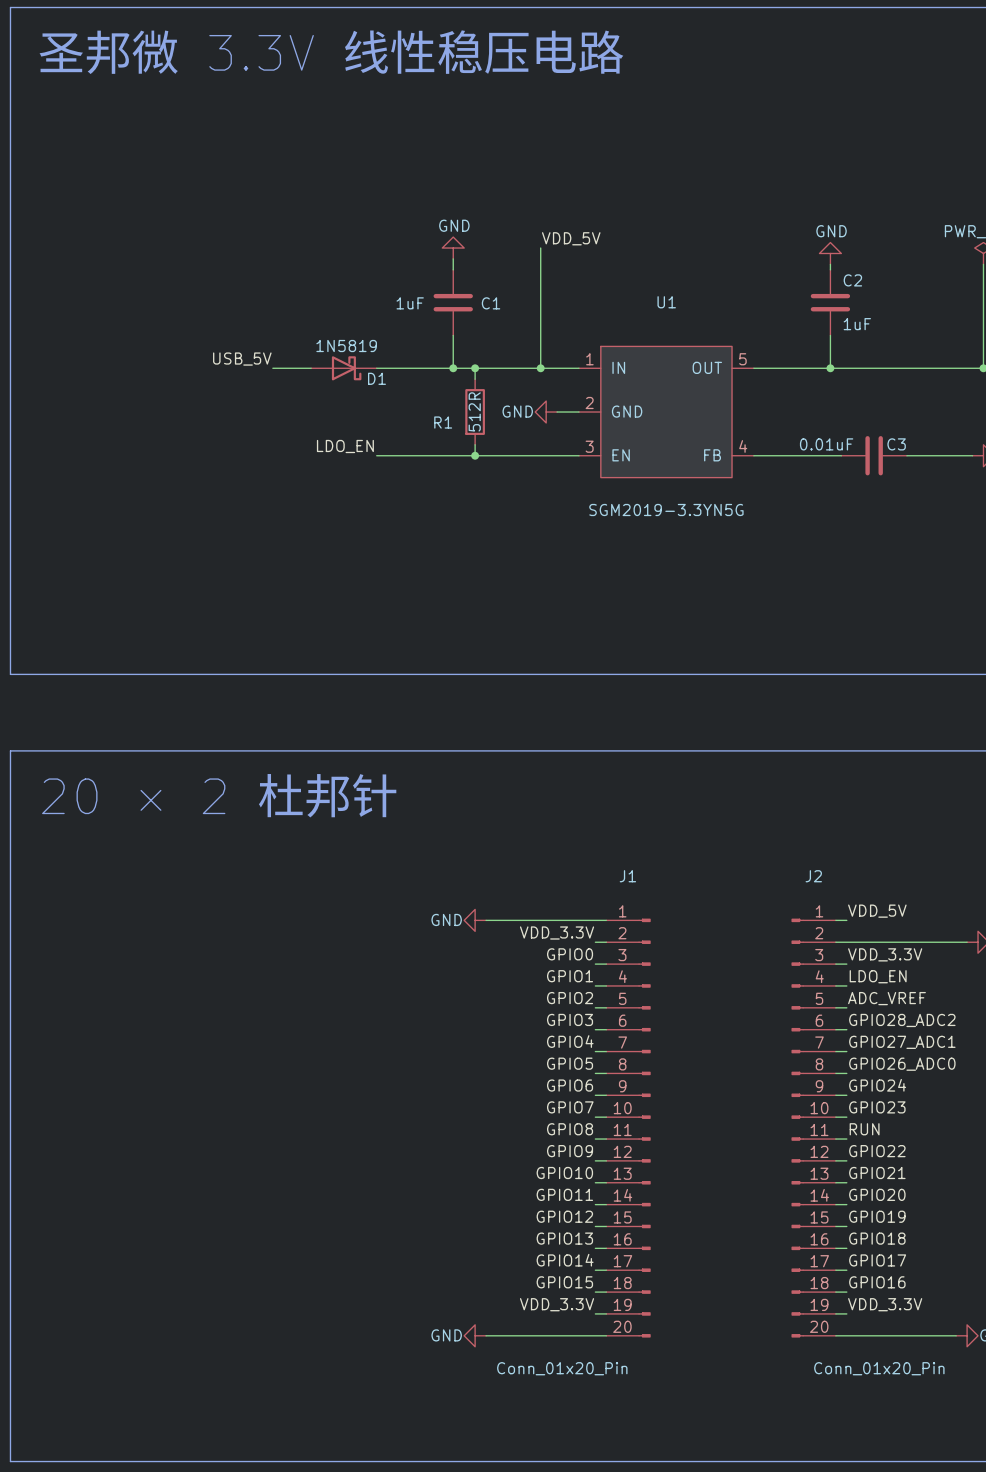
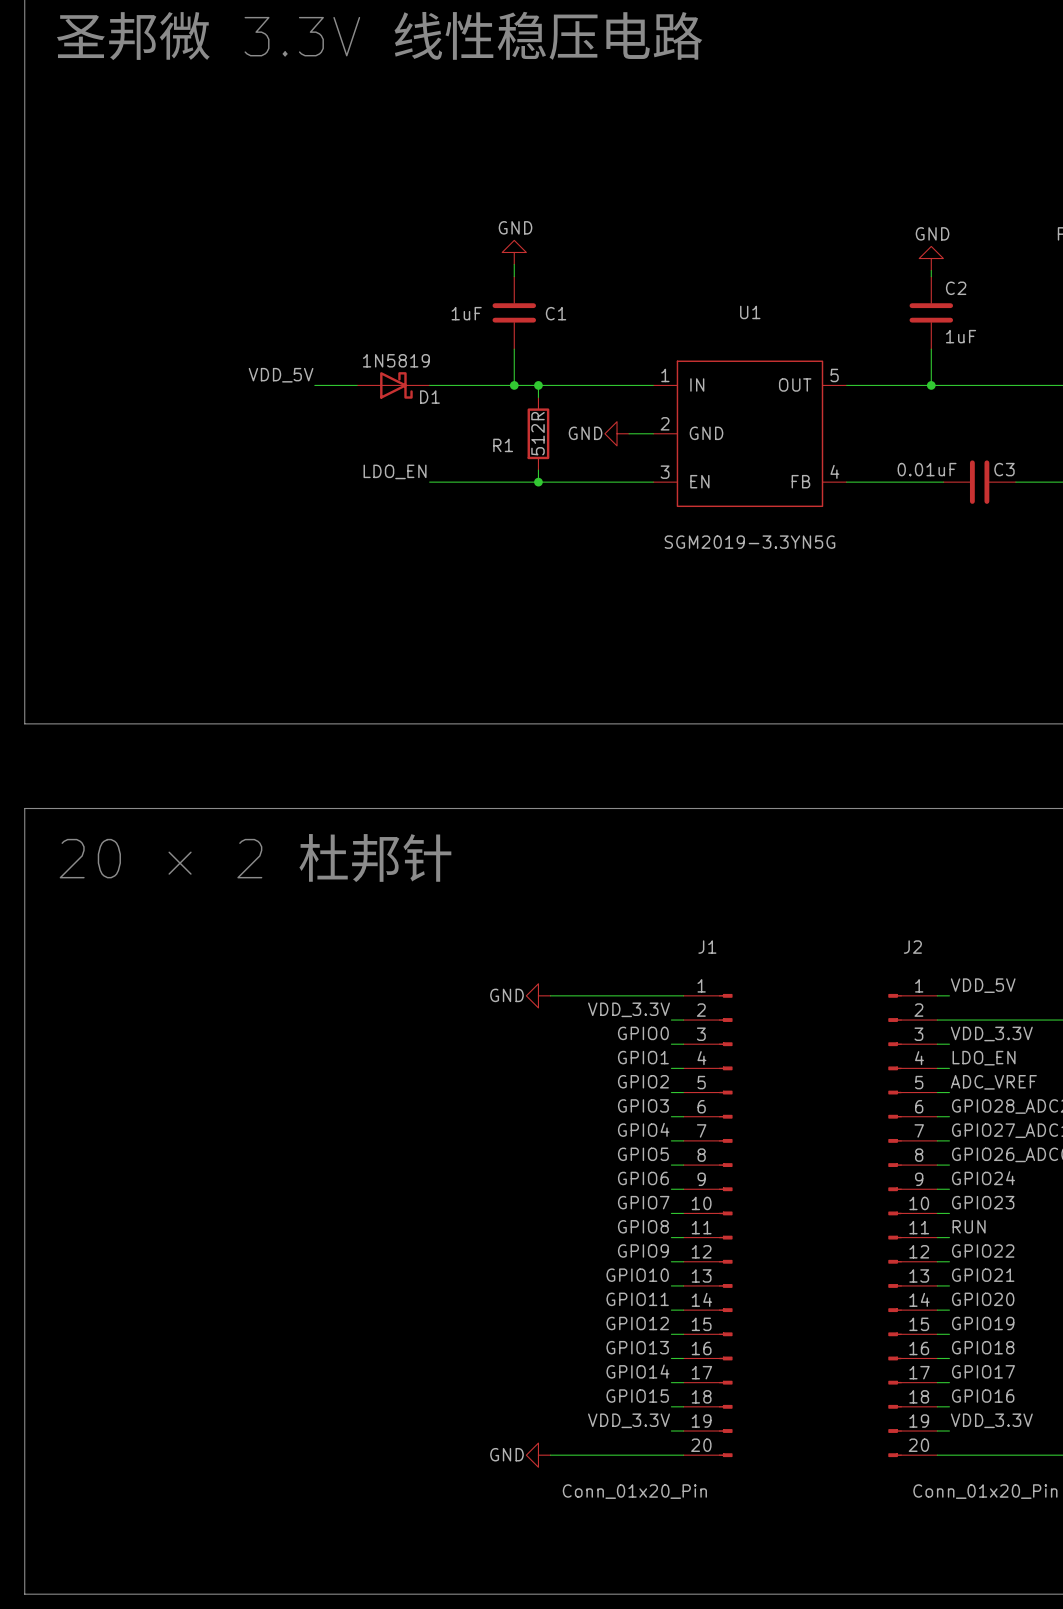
label: VDD_5V (571, 238) -> none
wire: (540, 248) (540, 368) -> none
label: USB_5V (242, 359) -> VDD_5V (281, 375)
junction: (540, 368) -> none

